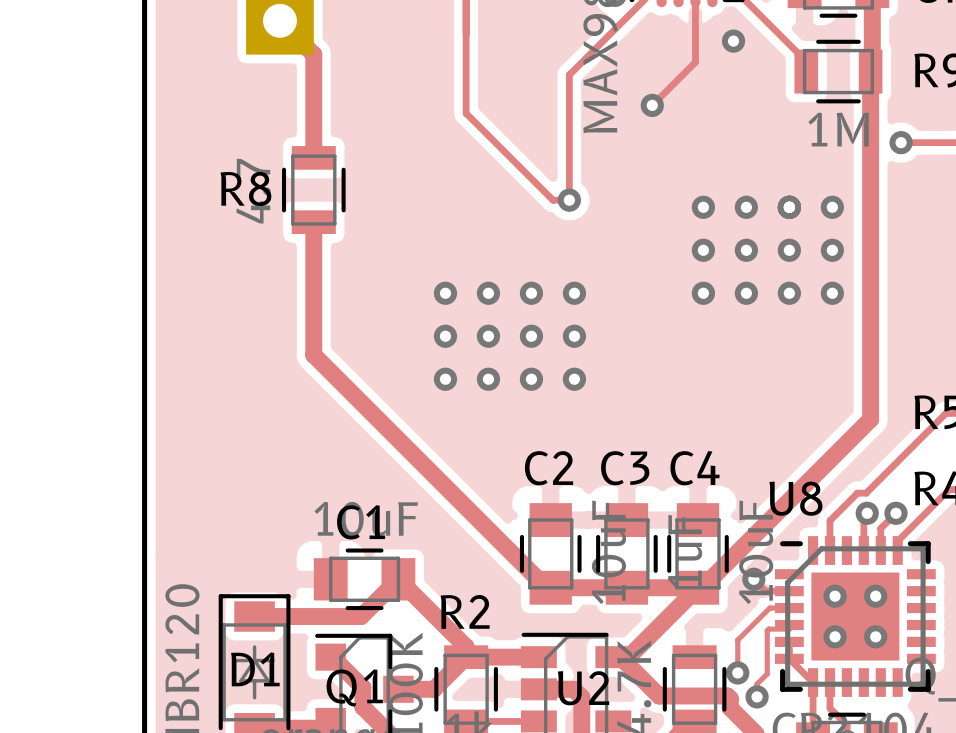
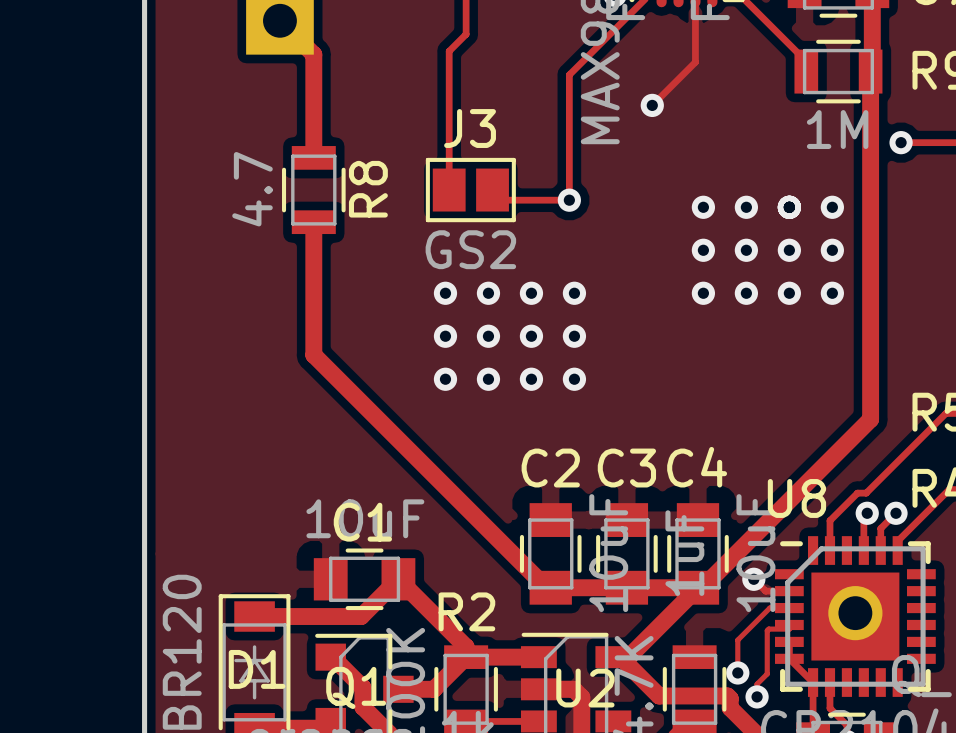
track: (466, 34) (466, 113) (552, 200) -> (466, 34) (449, 51) (449, 190)
via: (733, 41) -> none
R8 name rotation: 0° (245, 188) -> 90° counterclockwise (368, 189)
R8 name position: R8 (245, 188) -> R8 (368, 189)
J3: none -> GS2 (470, 190)
track: none -> (492, 190) (502, 200) (552, 200)
via: (835, 596) -> none
via: (875, 596) -> none
part: none -> (855, 613)
via: (835, 636) -> none
via: (875, 636) -> none

